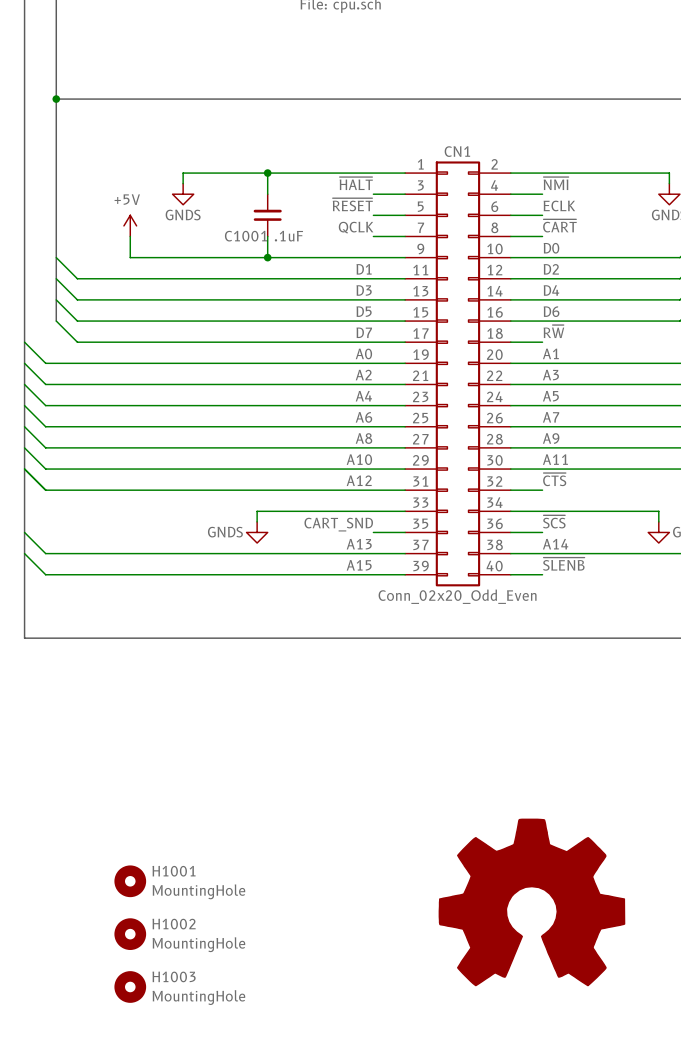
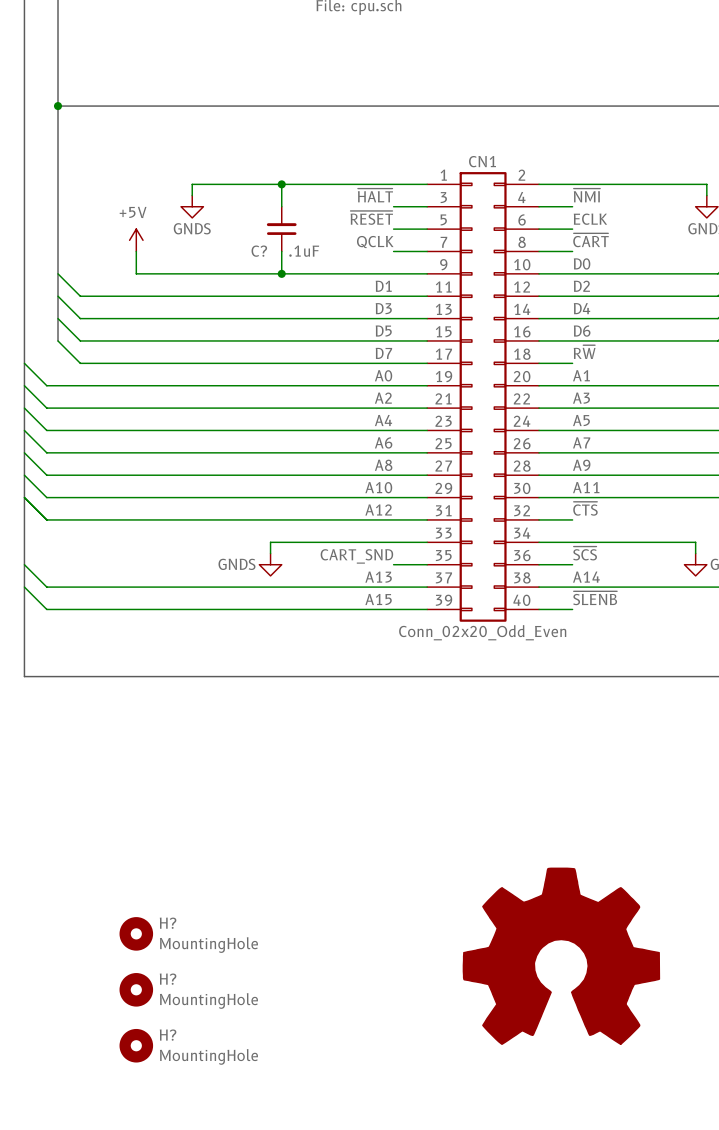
C1001 name: C1001 (245, 236) -> C? (259, 251)
H1001 name: H1001 (174, 871) -> H? (168, 923)
H1002 name: H1002 (174, 924) -> H? (168, 979)
H1003 name: H1003 (174, 976) -> H? (168, 1035)

